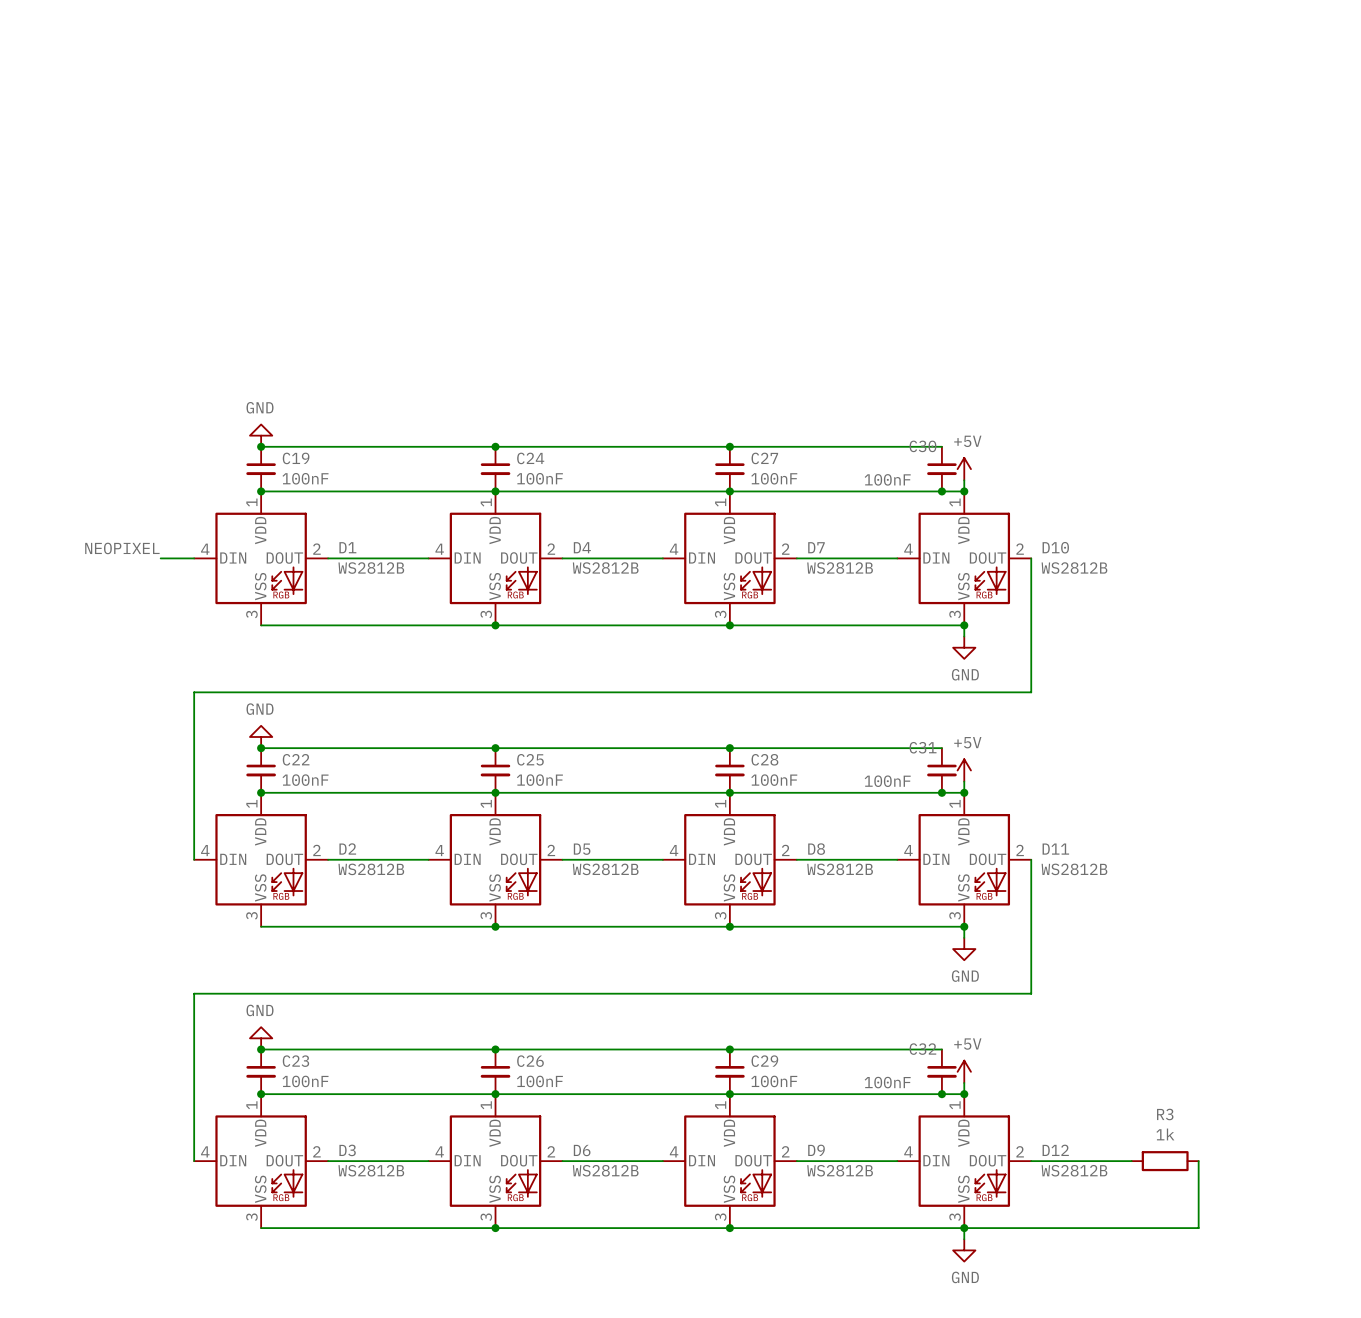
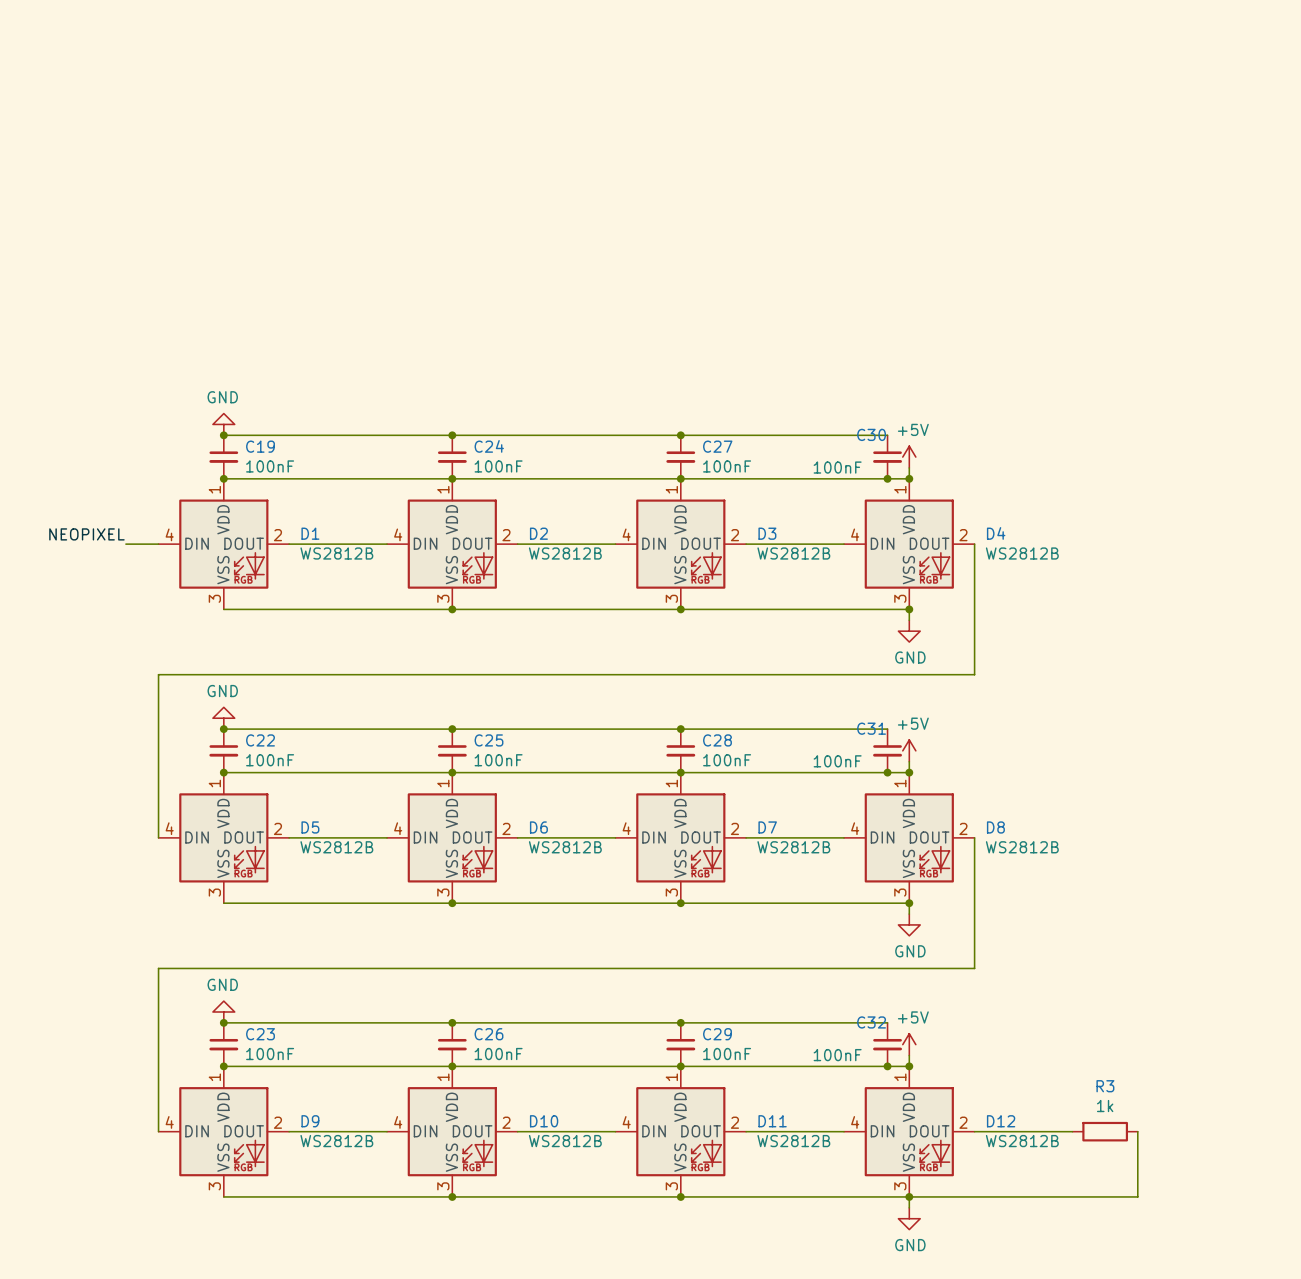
D4 name: D4 (582, 547) -> D2 (538, 533)
D7 name: D7 (816, 547) -> D3 (767, 533)
D10 name: D10 (1055, 547) -> D4 (996, 533)
D2 name: D2 (347, 848) -> D5 (310, 827)
D5 name: D5 (582, 849) -> D6 (538, 827)
D8 name: D8 (816, 849) -> D7 (767, 827)
D11 name: D11 (1055, 849) -> D8 (995, 827)
D3 name: D3 (347, 1150) -> D9 (310, 1121)
D6 name: D6 (582, 1150) -> D10 (544, 1121)
D9 name: D9 (816, 1150) -> D11 (772, 1121)

